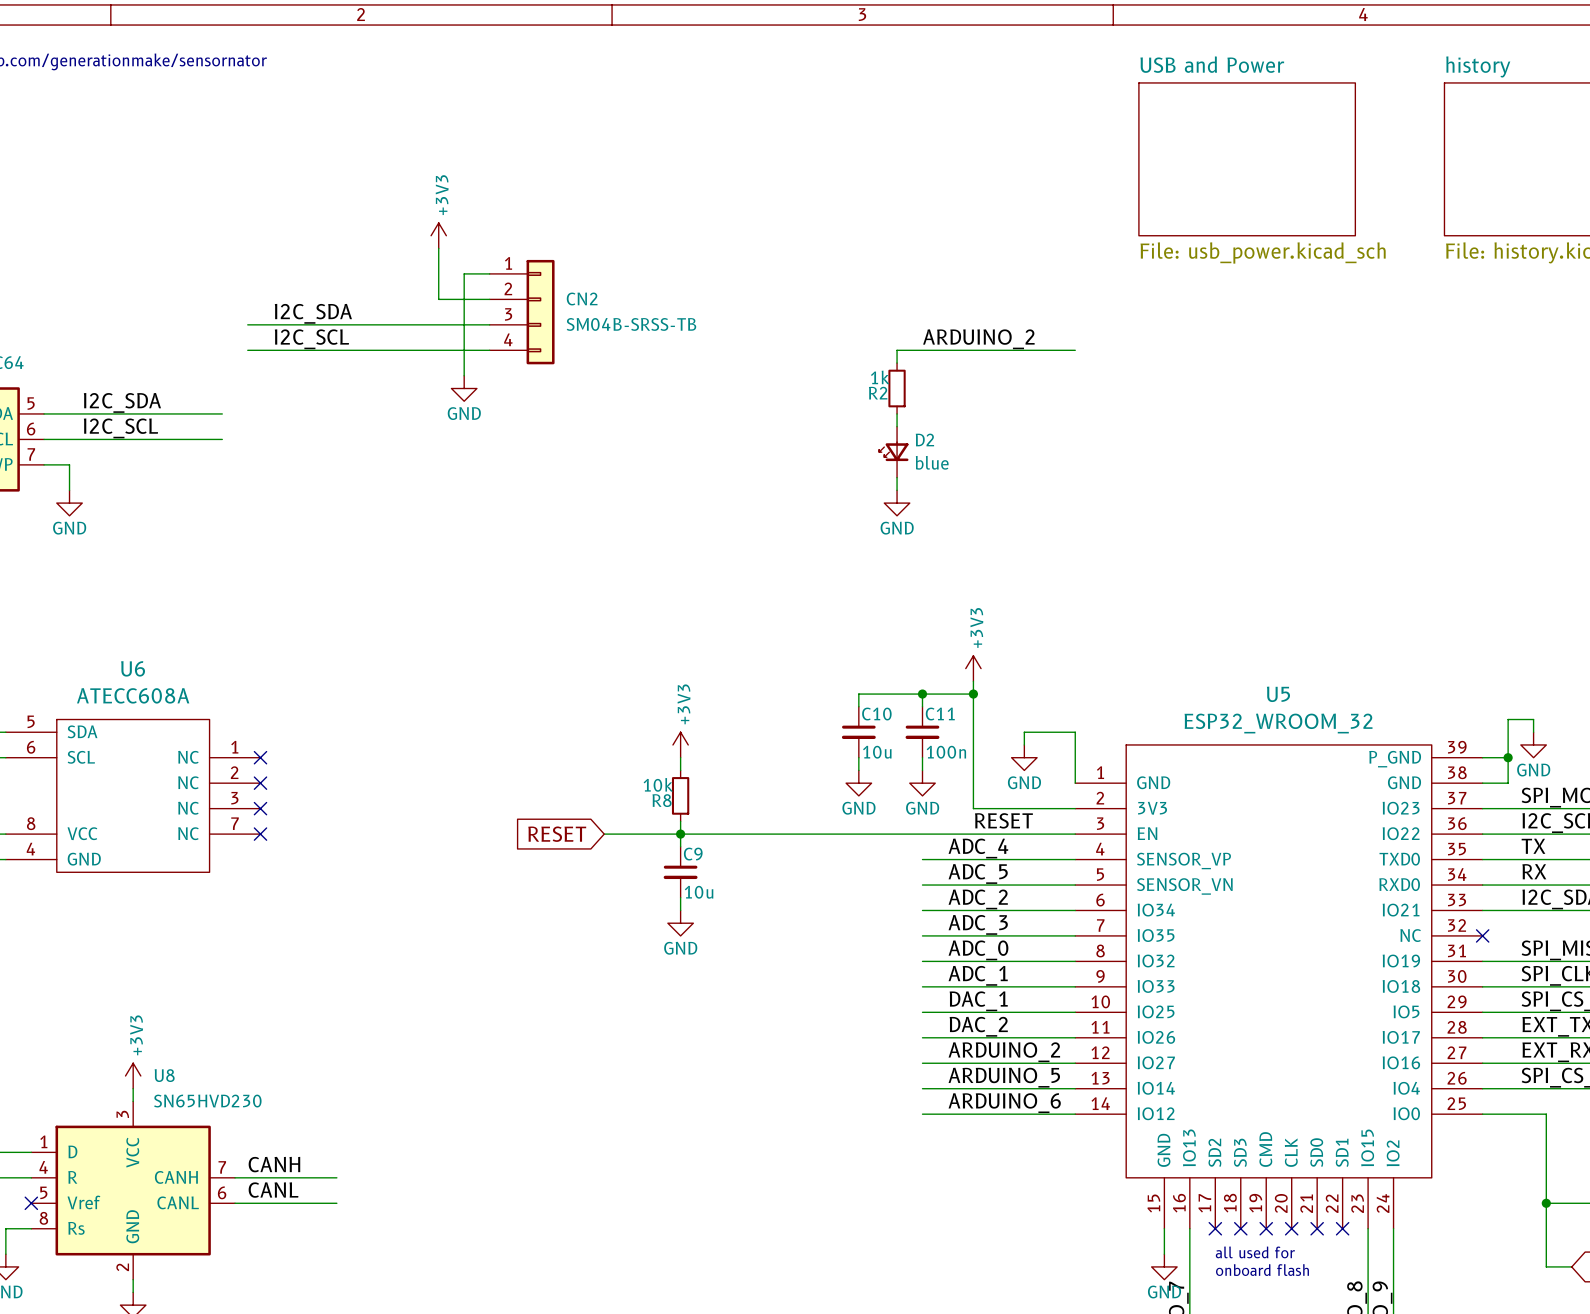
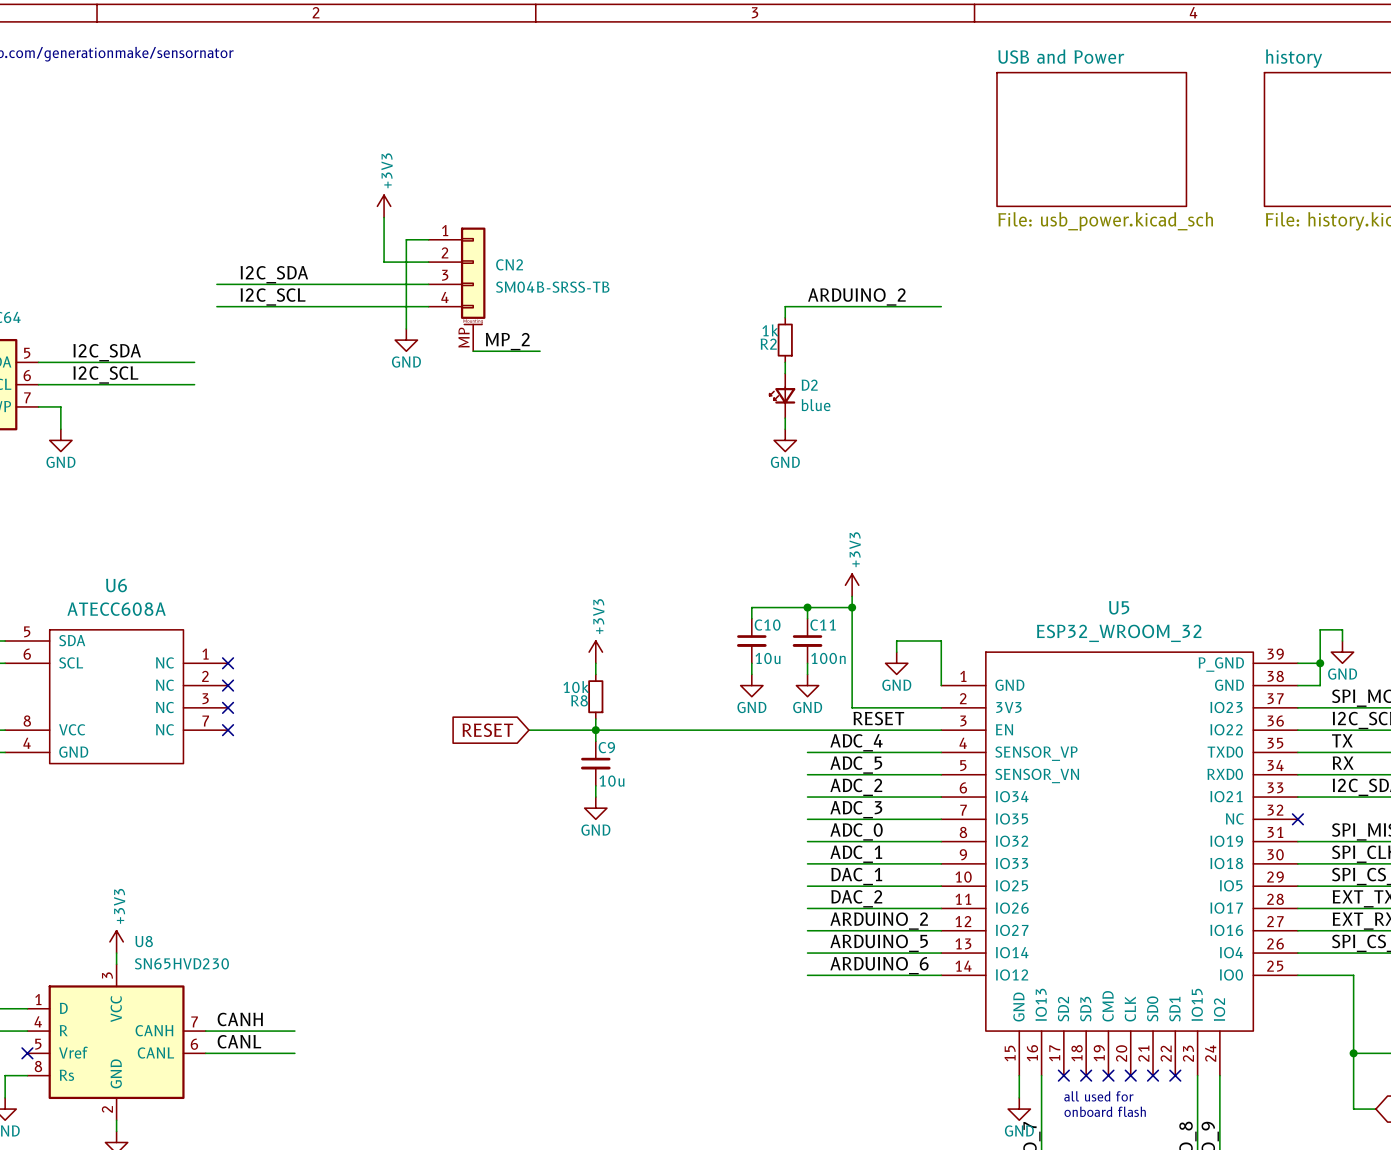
CN2 symbol: [489, 259, 555, 365] -> [428, 227, 486, 352]
label: none -> MP_2 (507, 341)
wire: none -> (473, 351) (540, 351)

